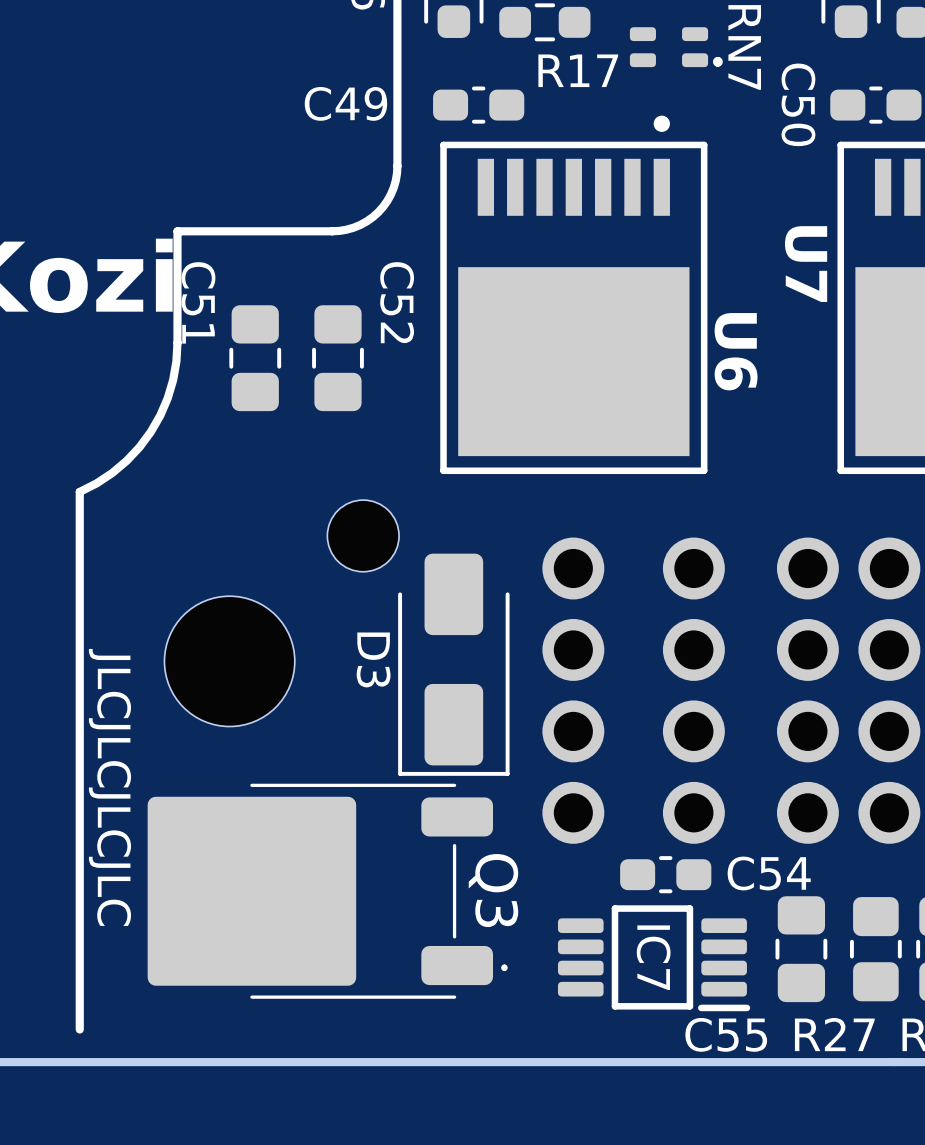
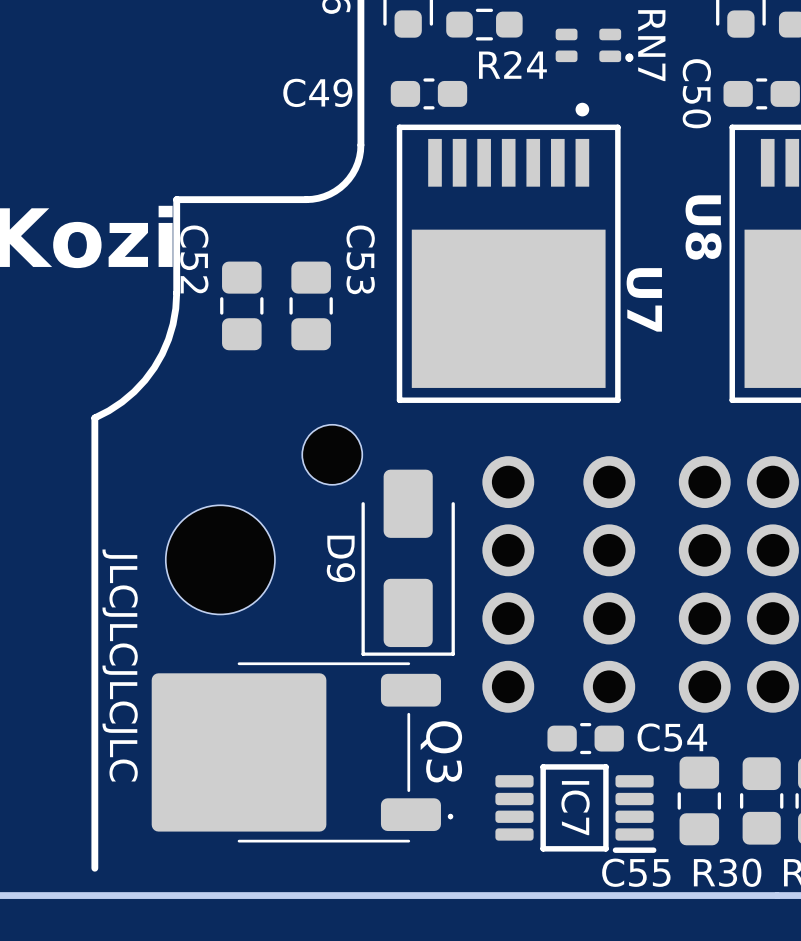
R17 name: R17 (578, 70) -> R24 (512, 64)
U7 name: U7 (806, 264) -> U8 (703, 227)
C51 name: C51 (198, 302) -> C52 (194, 259)
C52 name: C52 (397, 302) -> C53 (360, 259)
U6 name: U6 (736, 351) -> U7 (644, 299)
D3 name: D3 (373, 659) -> D9 (340, 558)
R27 name: R27 (834, 1034) -> R30 (727, 872)

